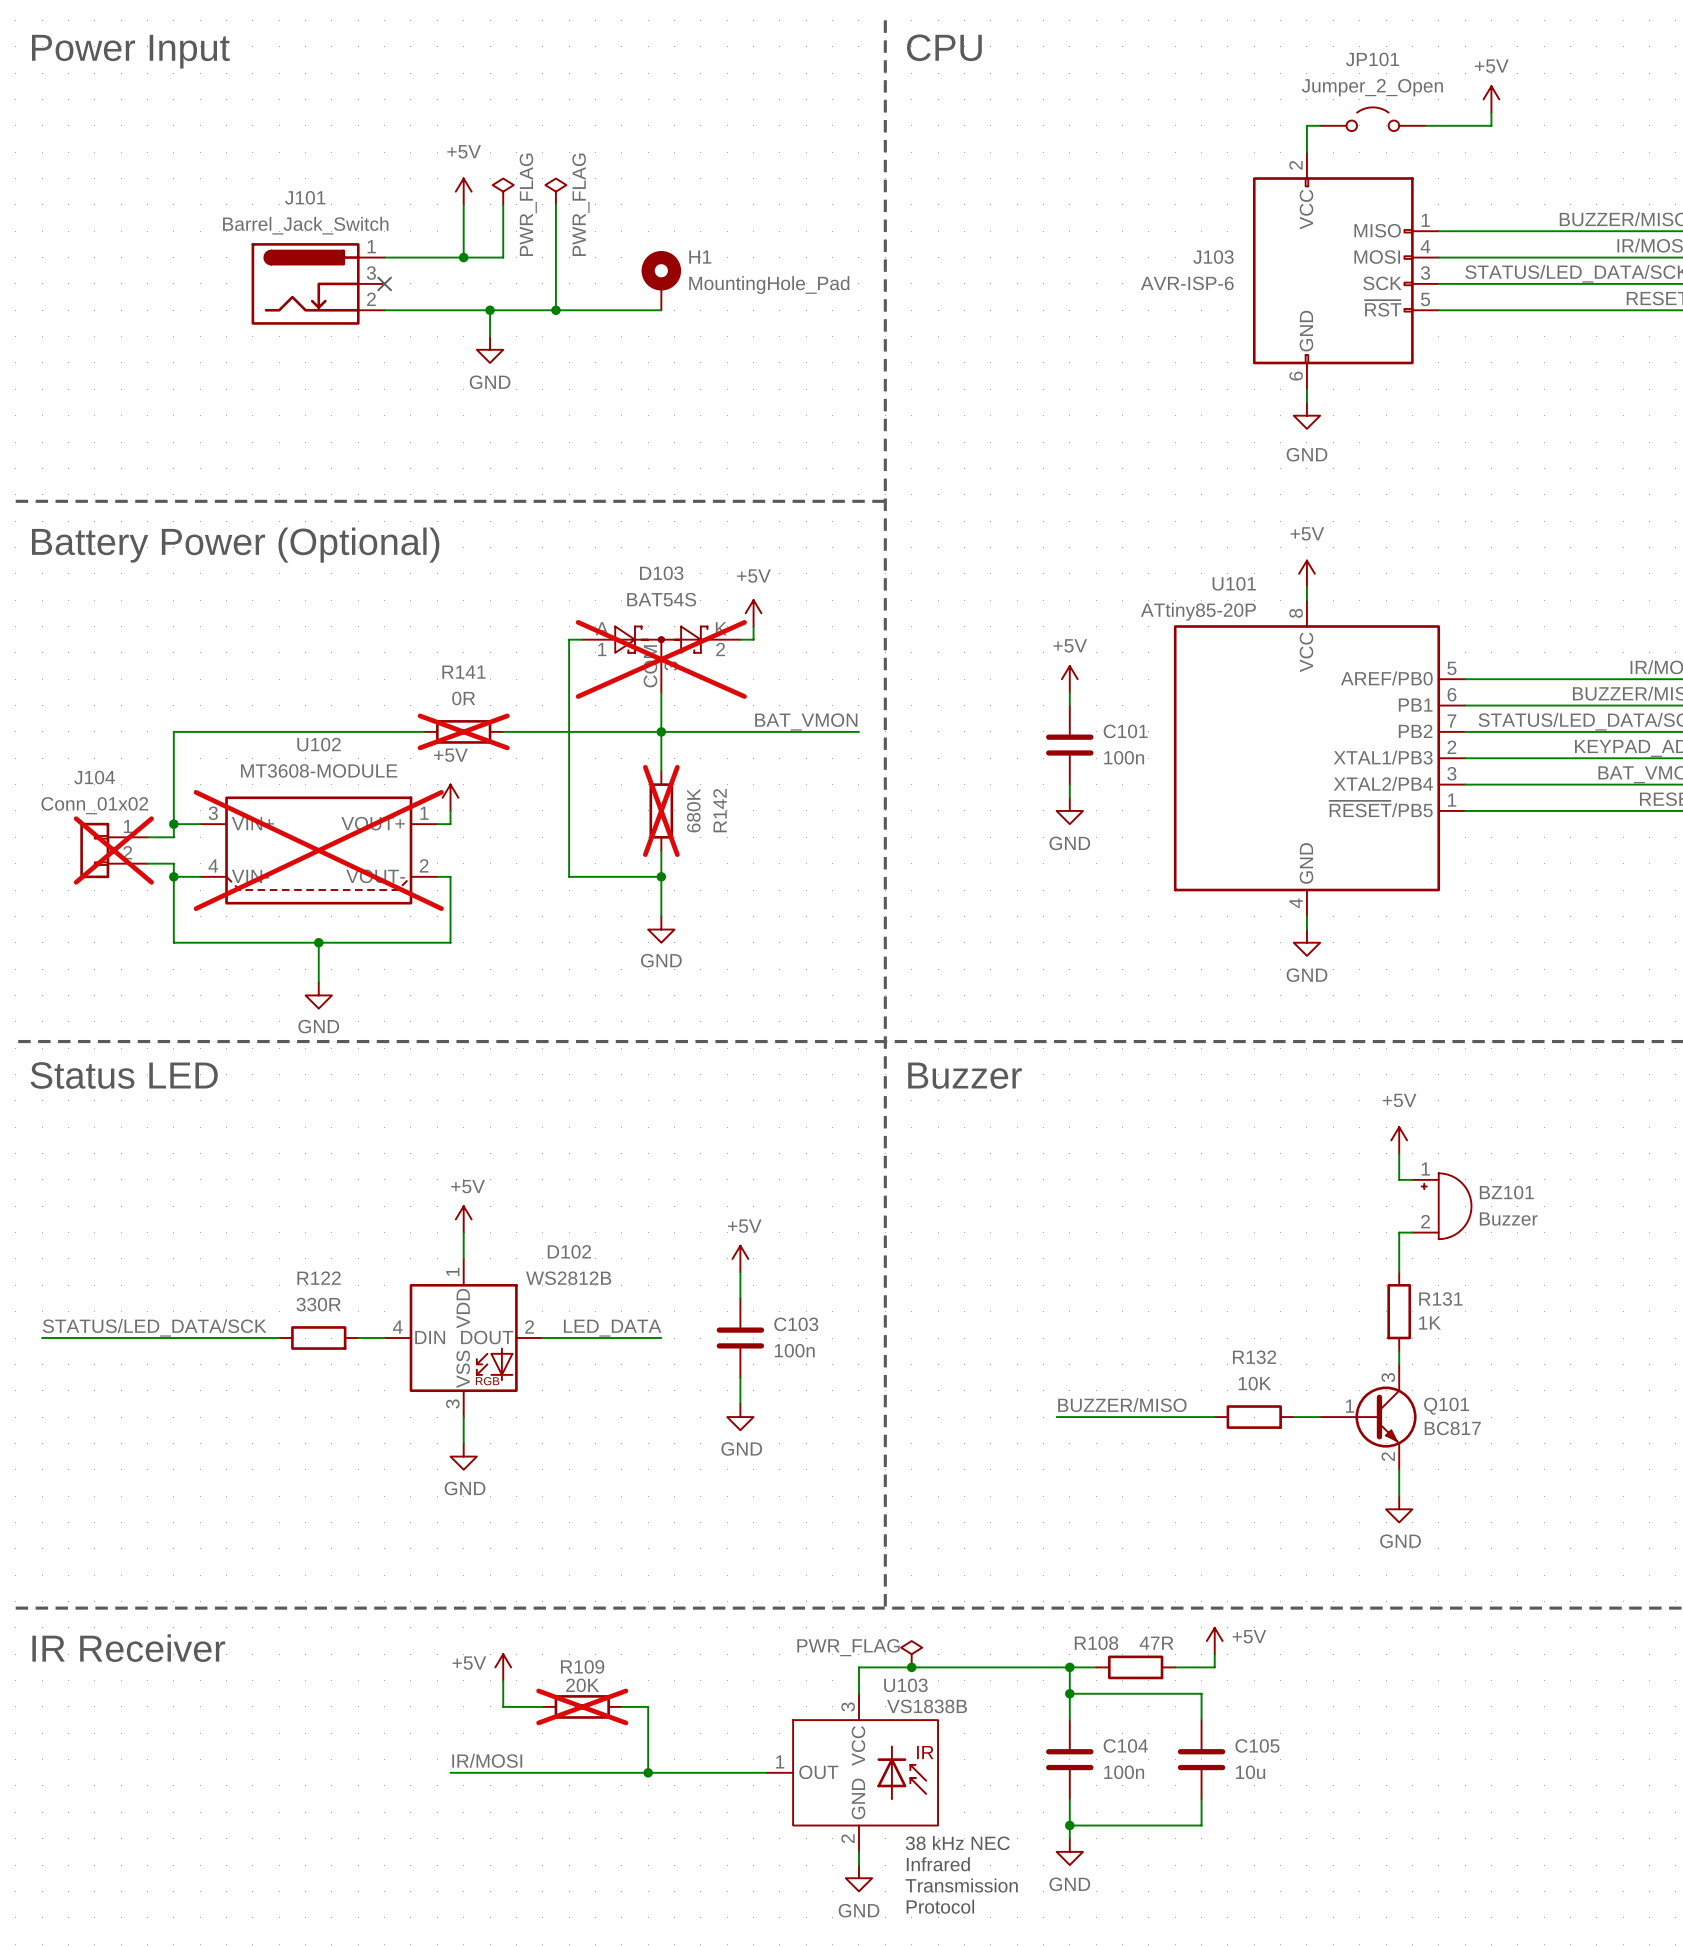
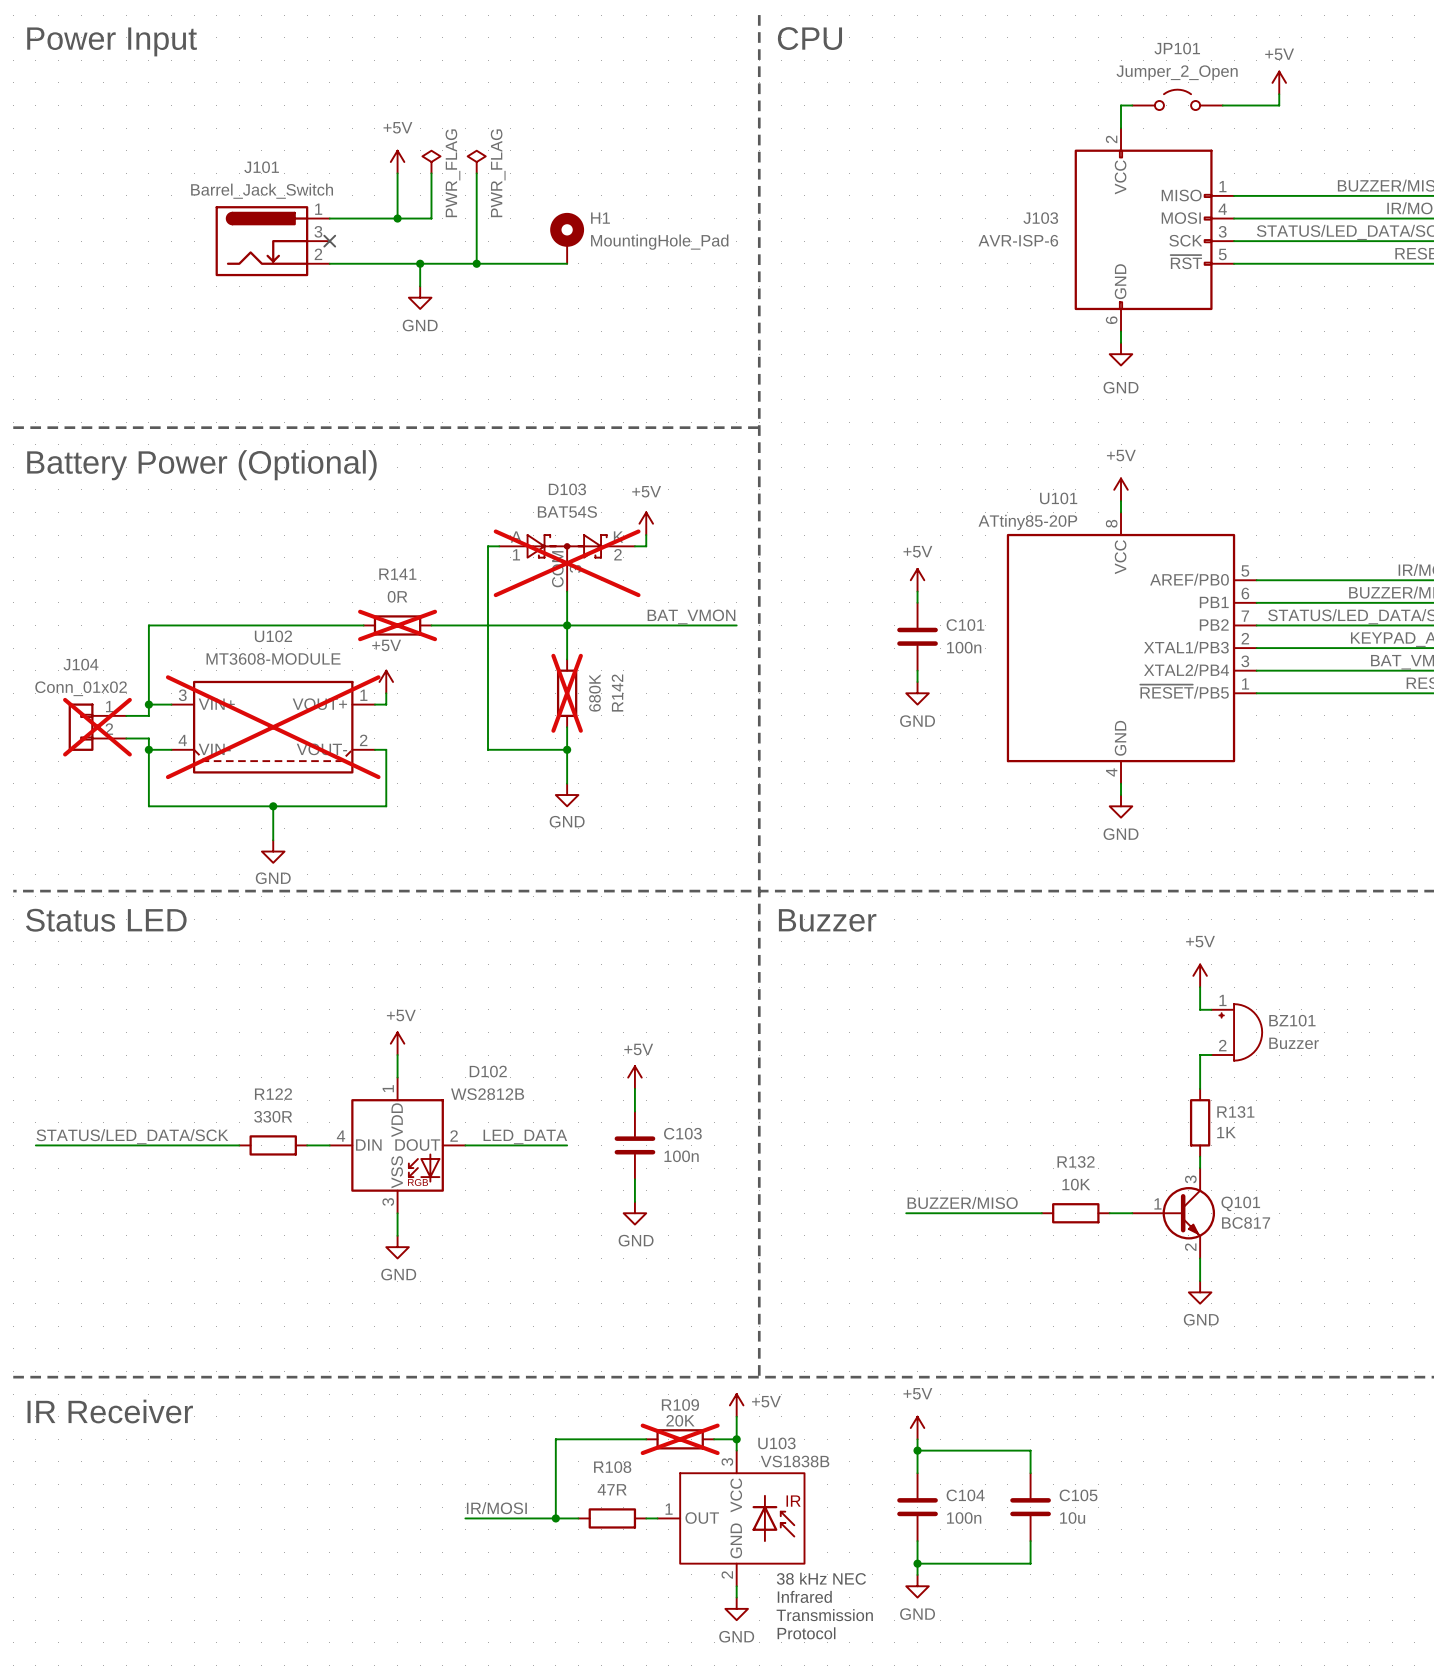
power symbol text position: +5V (1249, 1636) -> +5V (917, 1393)
power symbol: none -> +5V (736, 1405)
power symbol position: +5V (1214, 1641) -> +5V (917, 1428)
R108 name position: R108 (1096, 1643) -> R108 (612, 1467)
R108 value position: 47R (1156, 1643) -> 47R (612, 1489)
power symbol: PWR_FLAG (911, 1654) -> none
wire: (1214, 1654) (1214, 1667) (1175, 1667) -> none
power symbol: +5V (503, 1667) -> none
wire: (858, 1667) (1096, 1667) -> (736, 1428) (736, 1416)
junction position: (911, 1667) -> (736, 1439)
junction: (1069, 1667) -> none
R108 position: (1135, 1667) -> (612, 1518)
wire: (503, 1680) (503, 1706) (542, 1706) -> none
wire: none -> (714, 1439) (736, 1439)
R109 position: (582, 1706) -> (680, 1439)
wire: (621, 1706) (648, 1706) -> (646, 1439) (555, 1439) (555, 1461)
label position: IR/MOSI (487, 1760) -> IR/MOSI (496, 1508)
wire: (450, 1772) (542, 1772) -> none
wire: (674, 1772) (753, 1772) -> none

